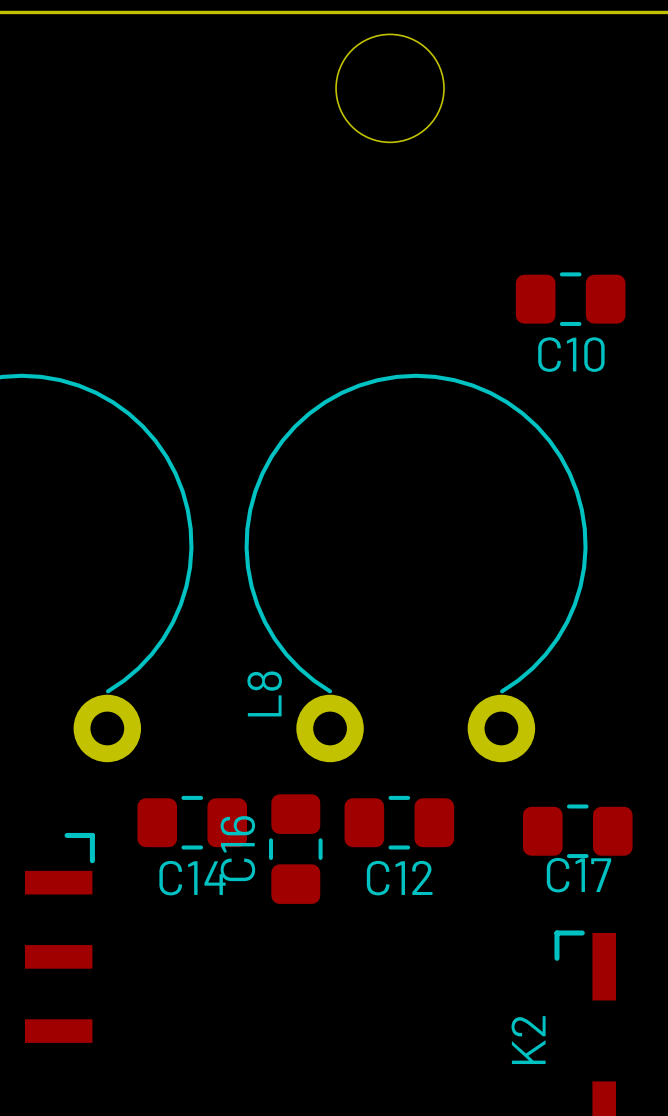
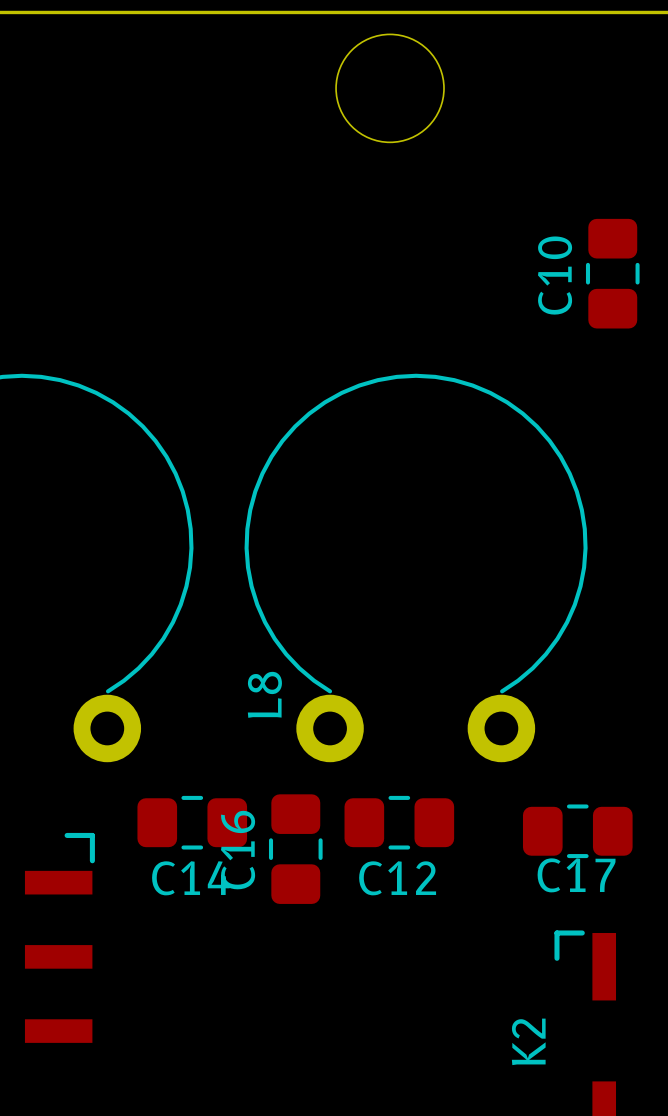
C10 rotation: 0° (570, 299) -> 90° clockwise (612, 273)

